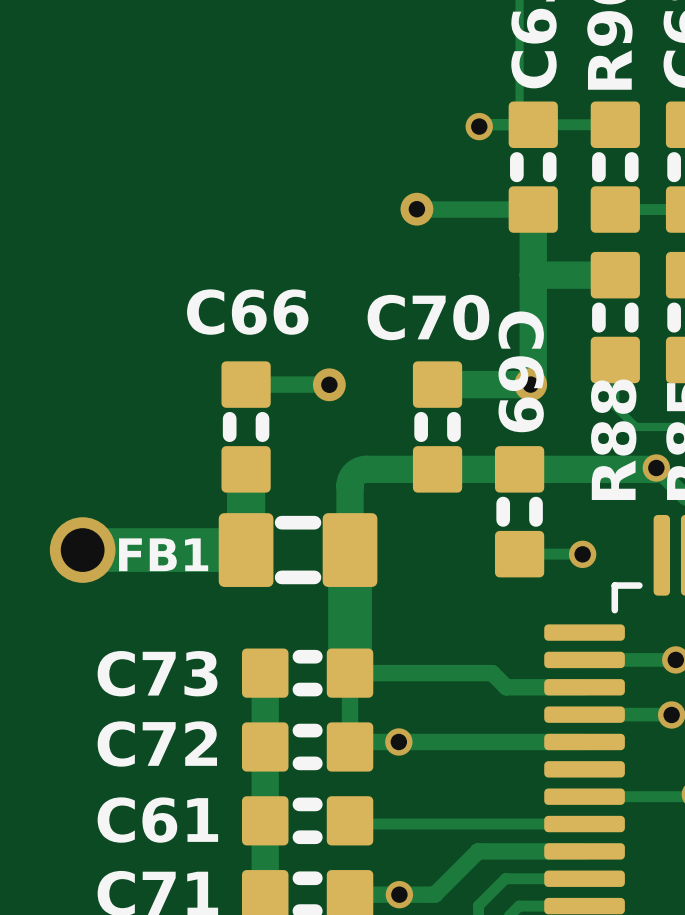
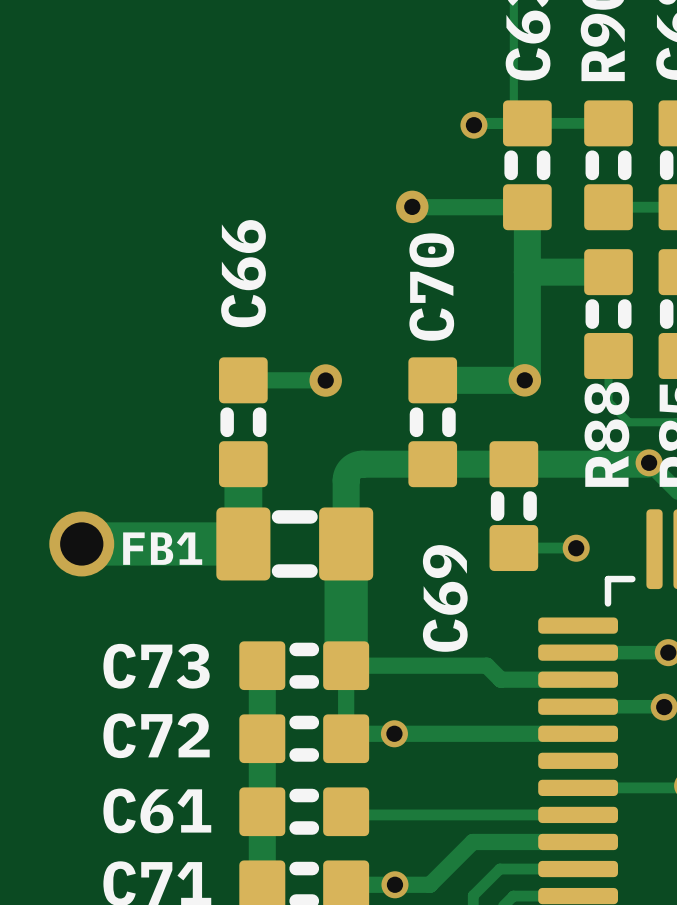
C66 name rotation: 0° (247, 312) -> 90° counterclockwise (243, 273)
C70 name rotation: 0° (428, 317) -> 90° counterclockwise (431, 287)
C69 name rotation: 0° (521, 371) -> 180° (445, 598)
C69 name position: C69 (521, 371) -> C69 (445, 598)

